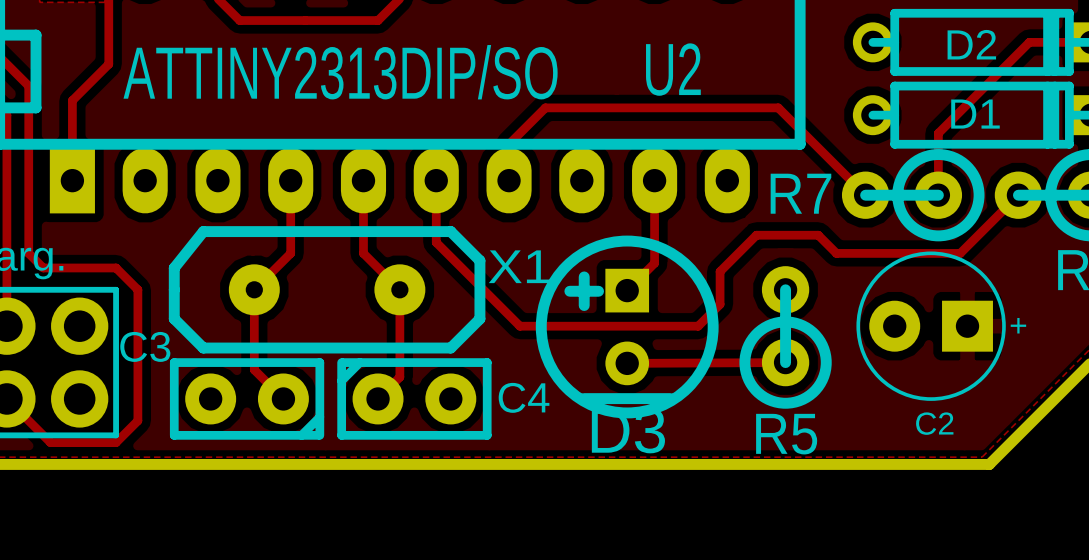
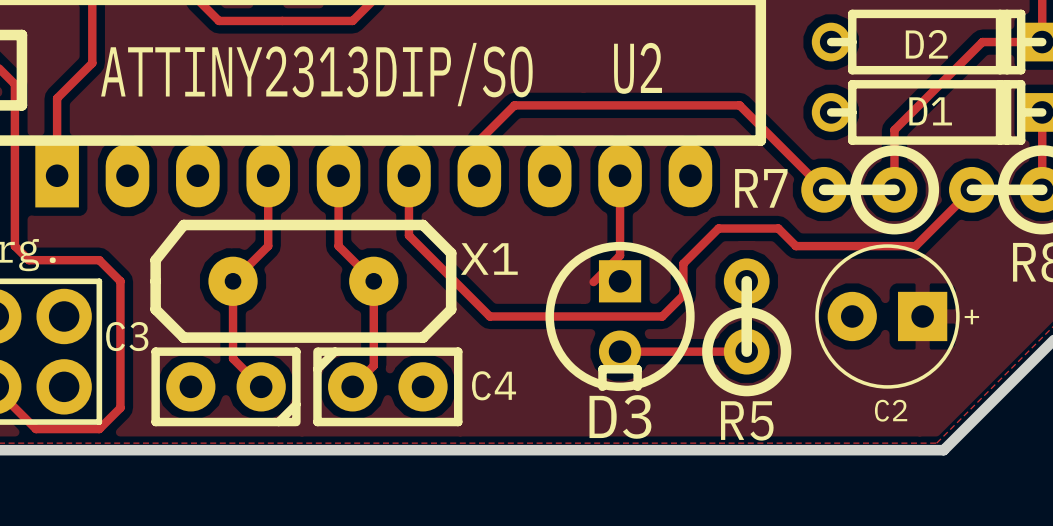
D3 footprint: [535, 235, 719, 419] -> [545, 241, 695, 392]
track: (785, 362) (627, 363) -> (746, 351) (620, 351)

